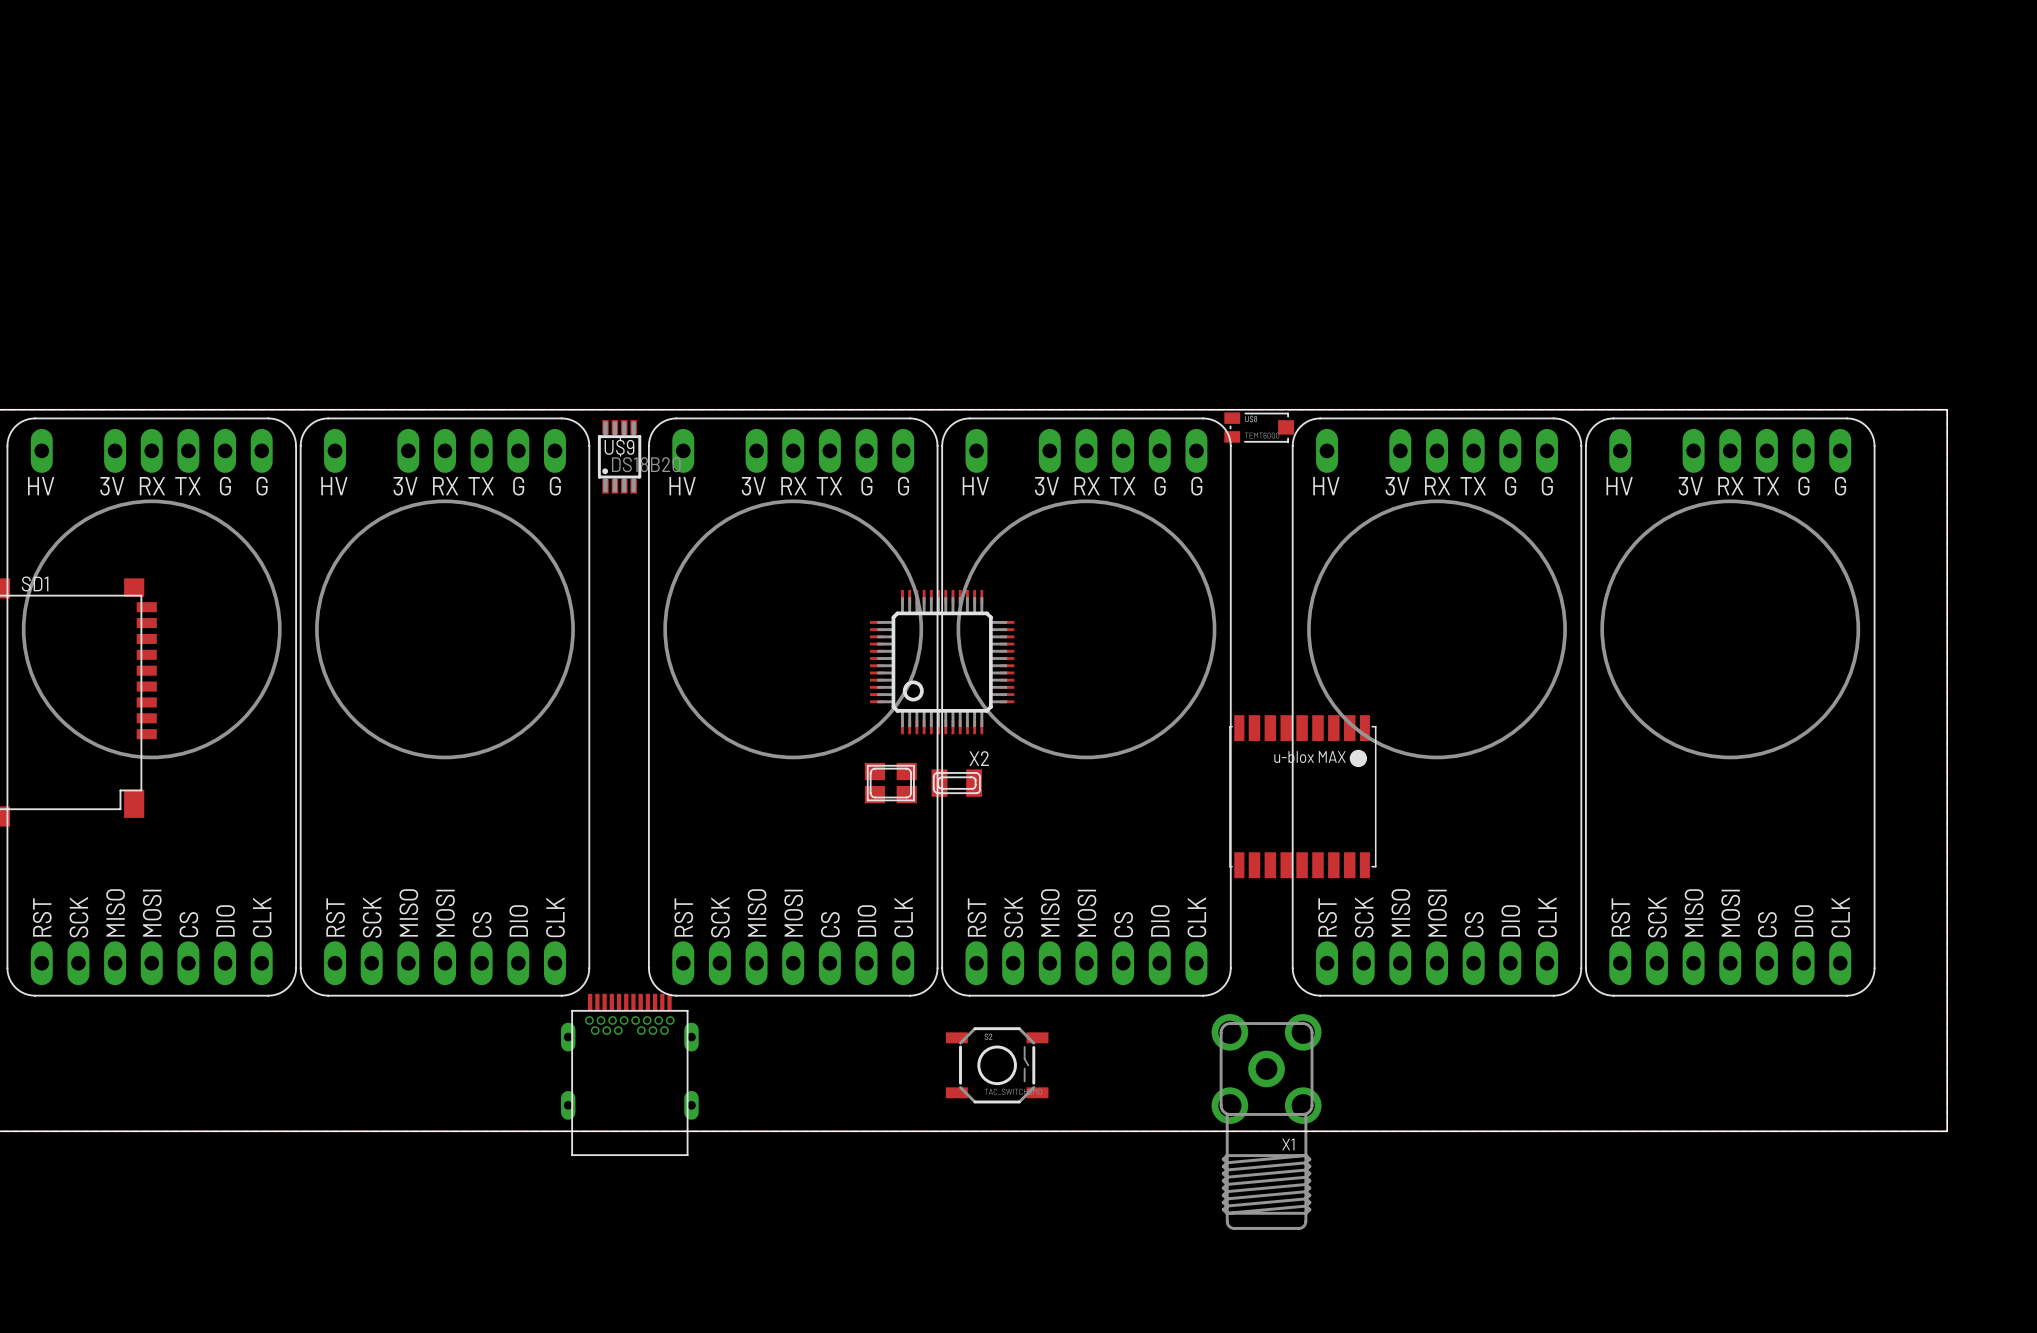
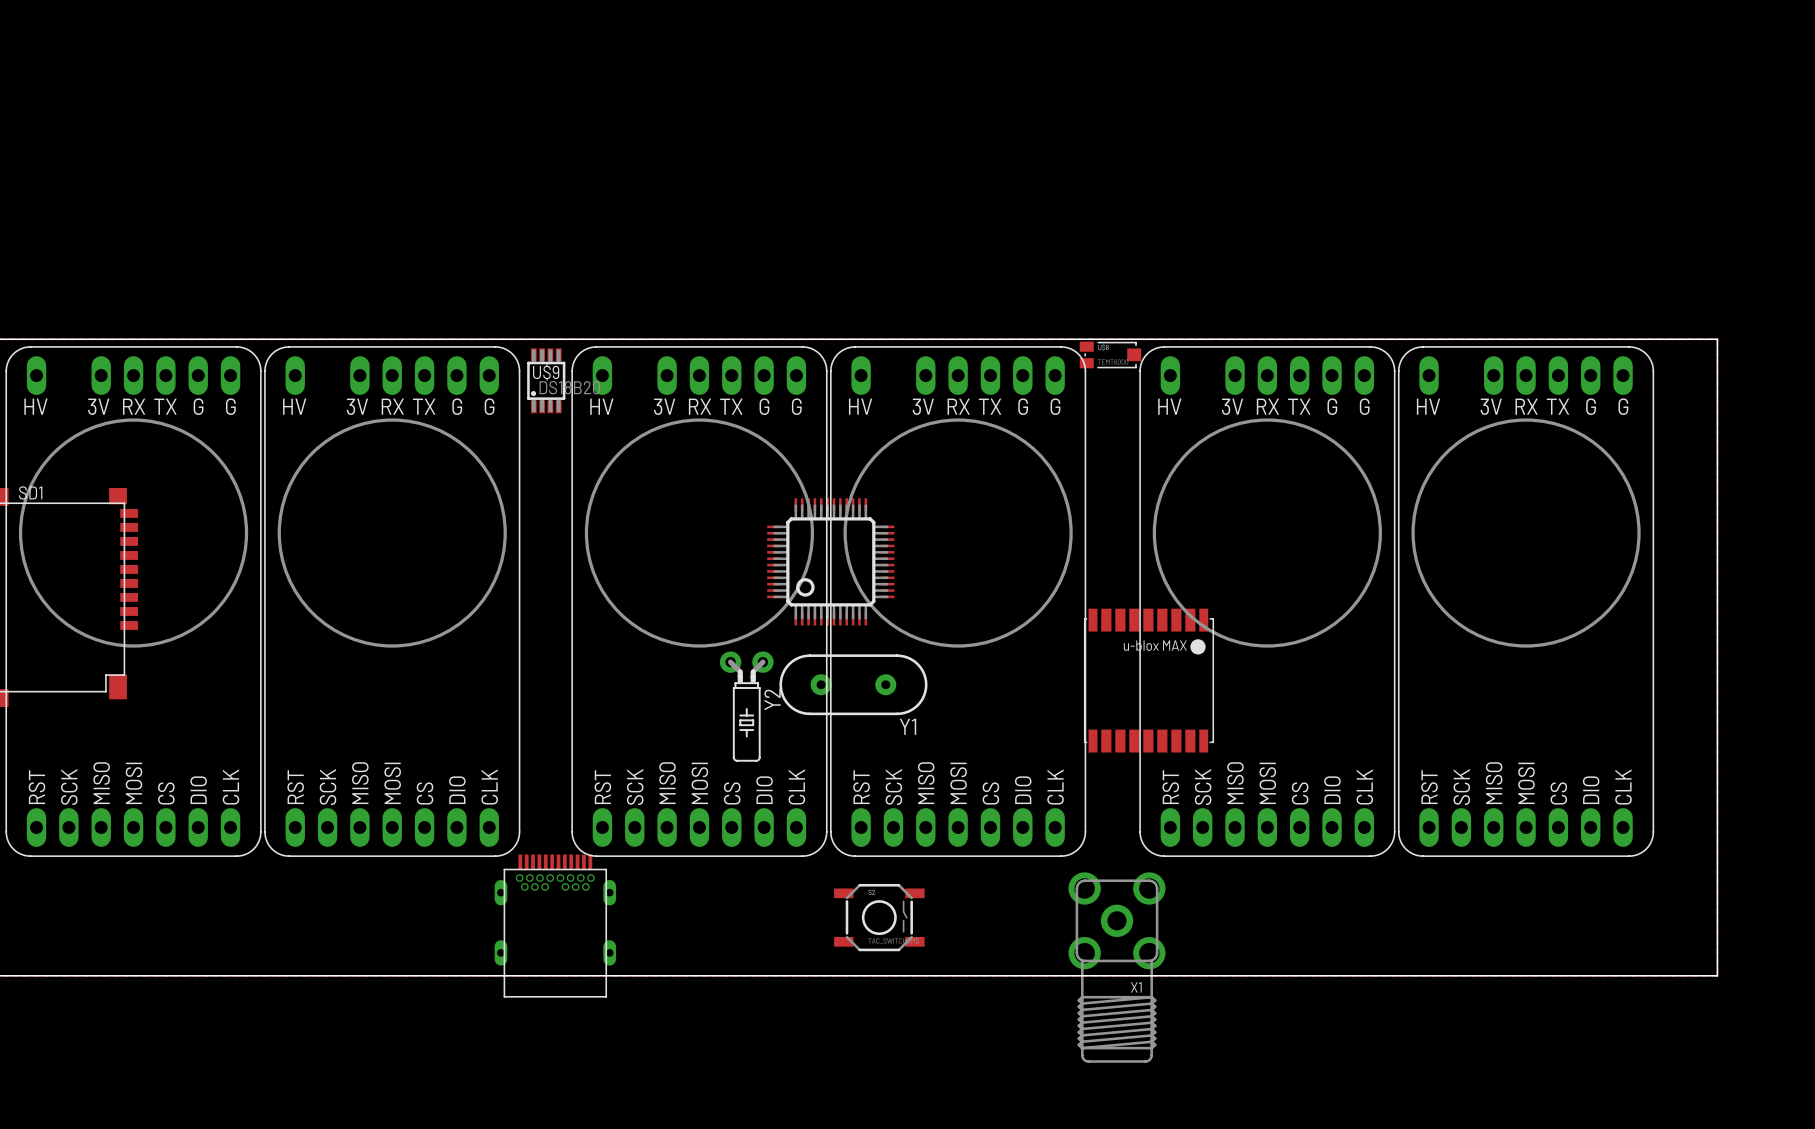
part: (890, 783) -> none
X2: (956, 783) -> none
Y1: none -> (853, 684)
Y2: none -> (746, 706)

